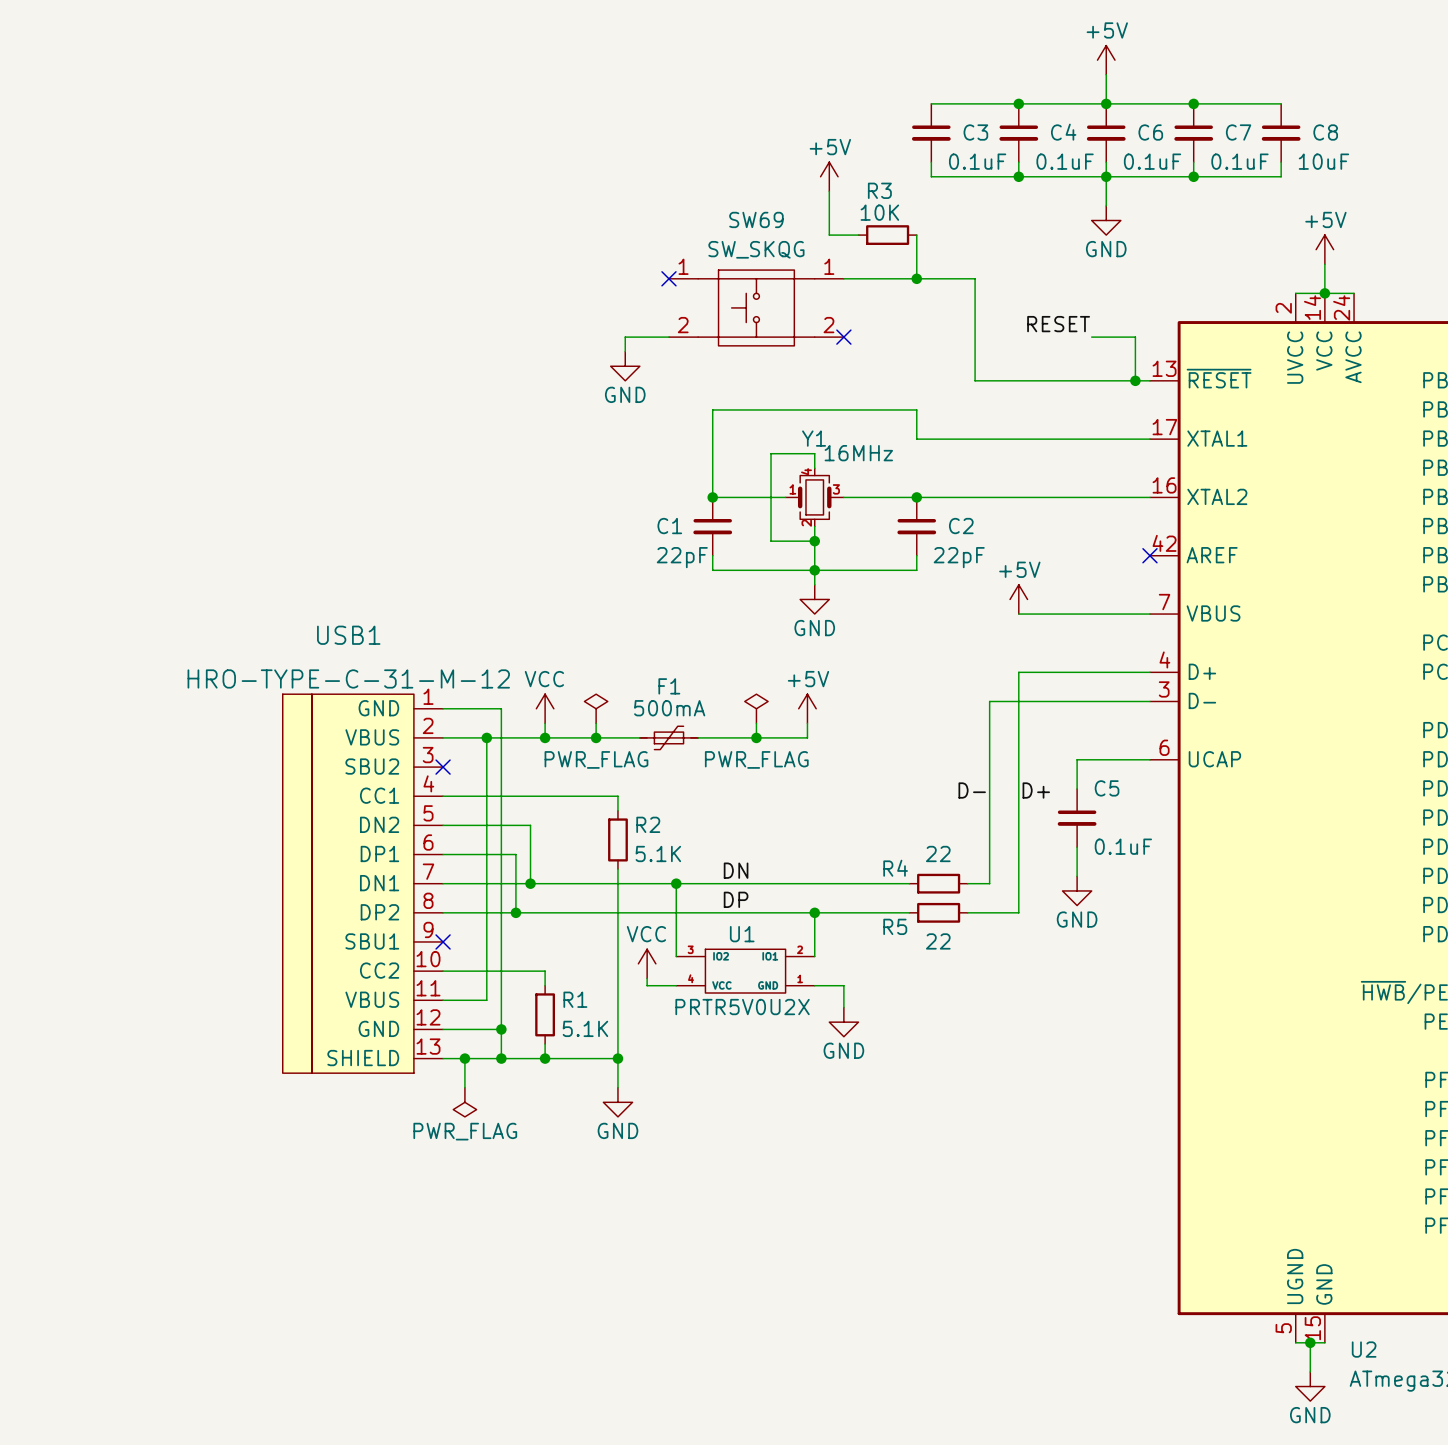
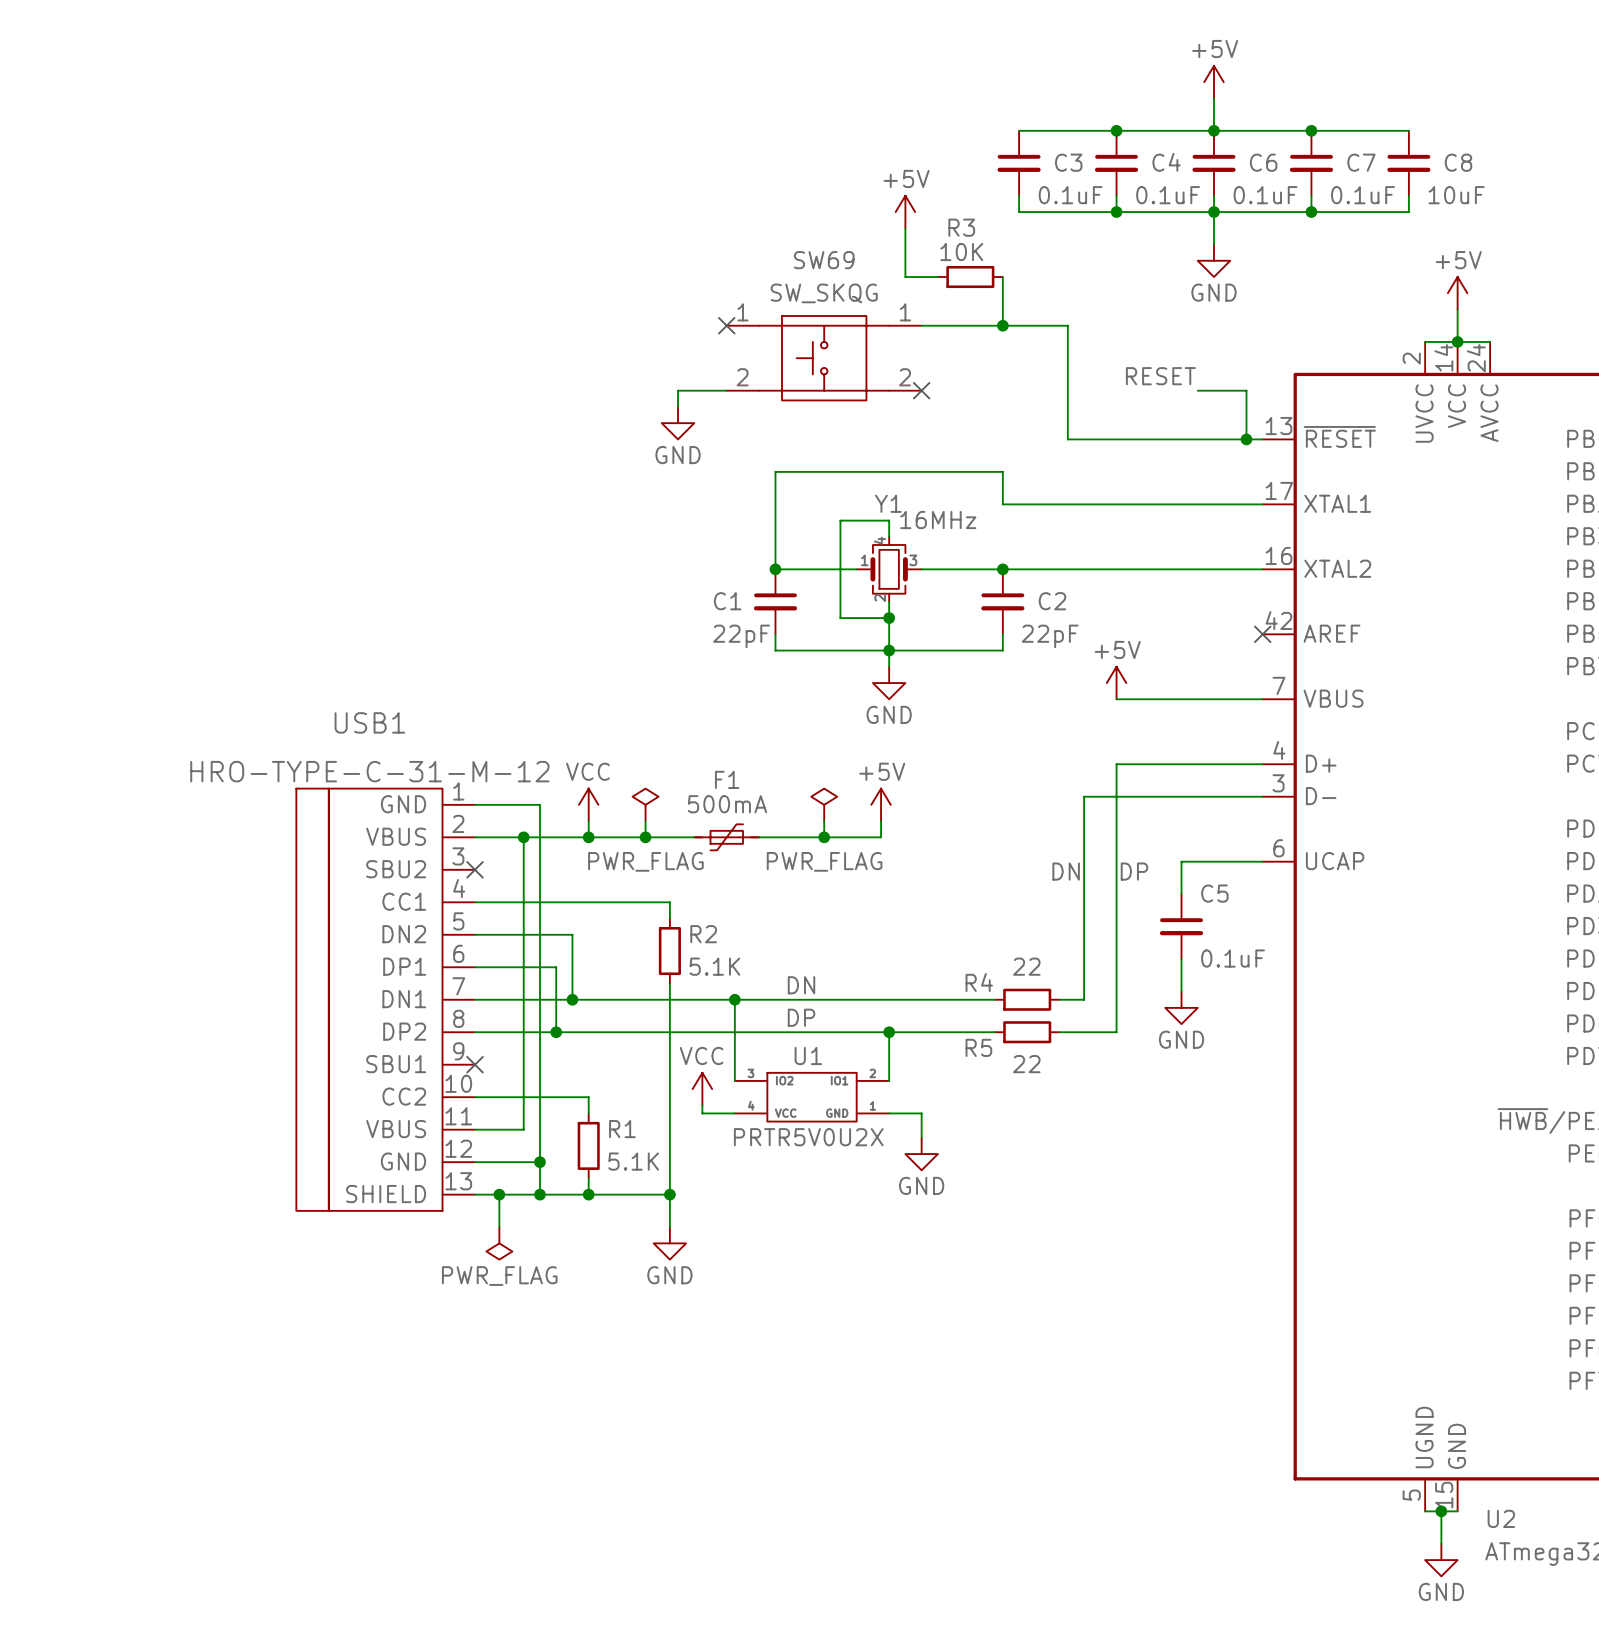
label: none -> DN (1066, 871)
label: none -> DP (1134, 871)
label: D- (972, 790) -> none
label: D+ (1036, 790) -> none

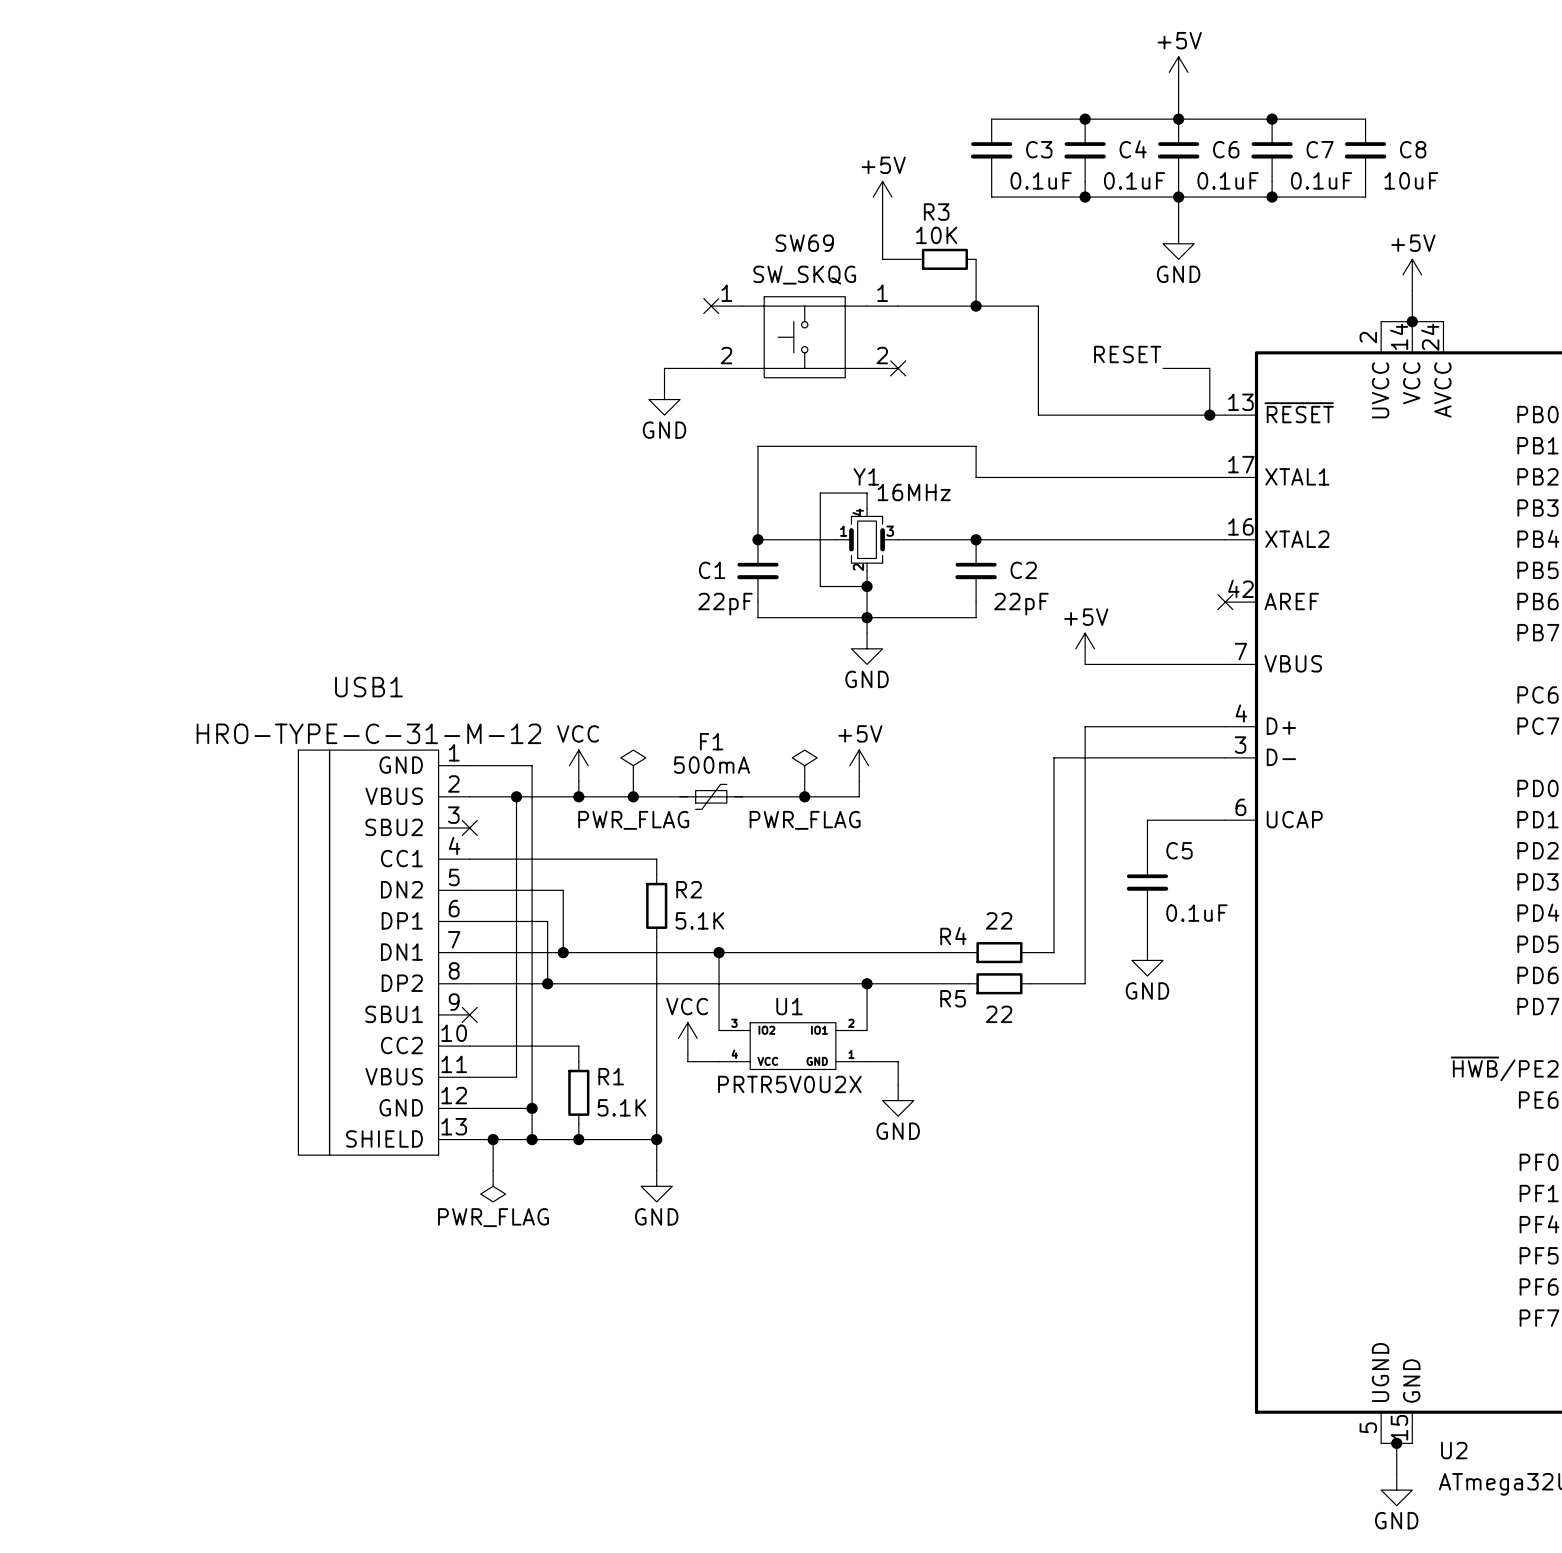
label: DN (1066, 871) -> none
label: DP (1134, 871) -> none
label: DN (801, 985) -> none
label: DP (801, 1017) -> none

